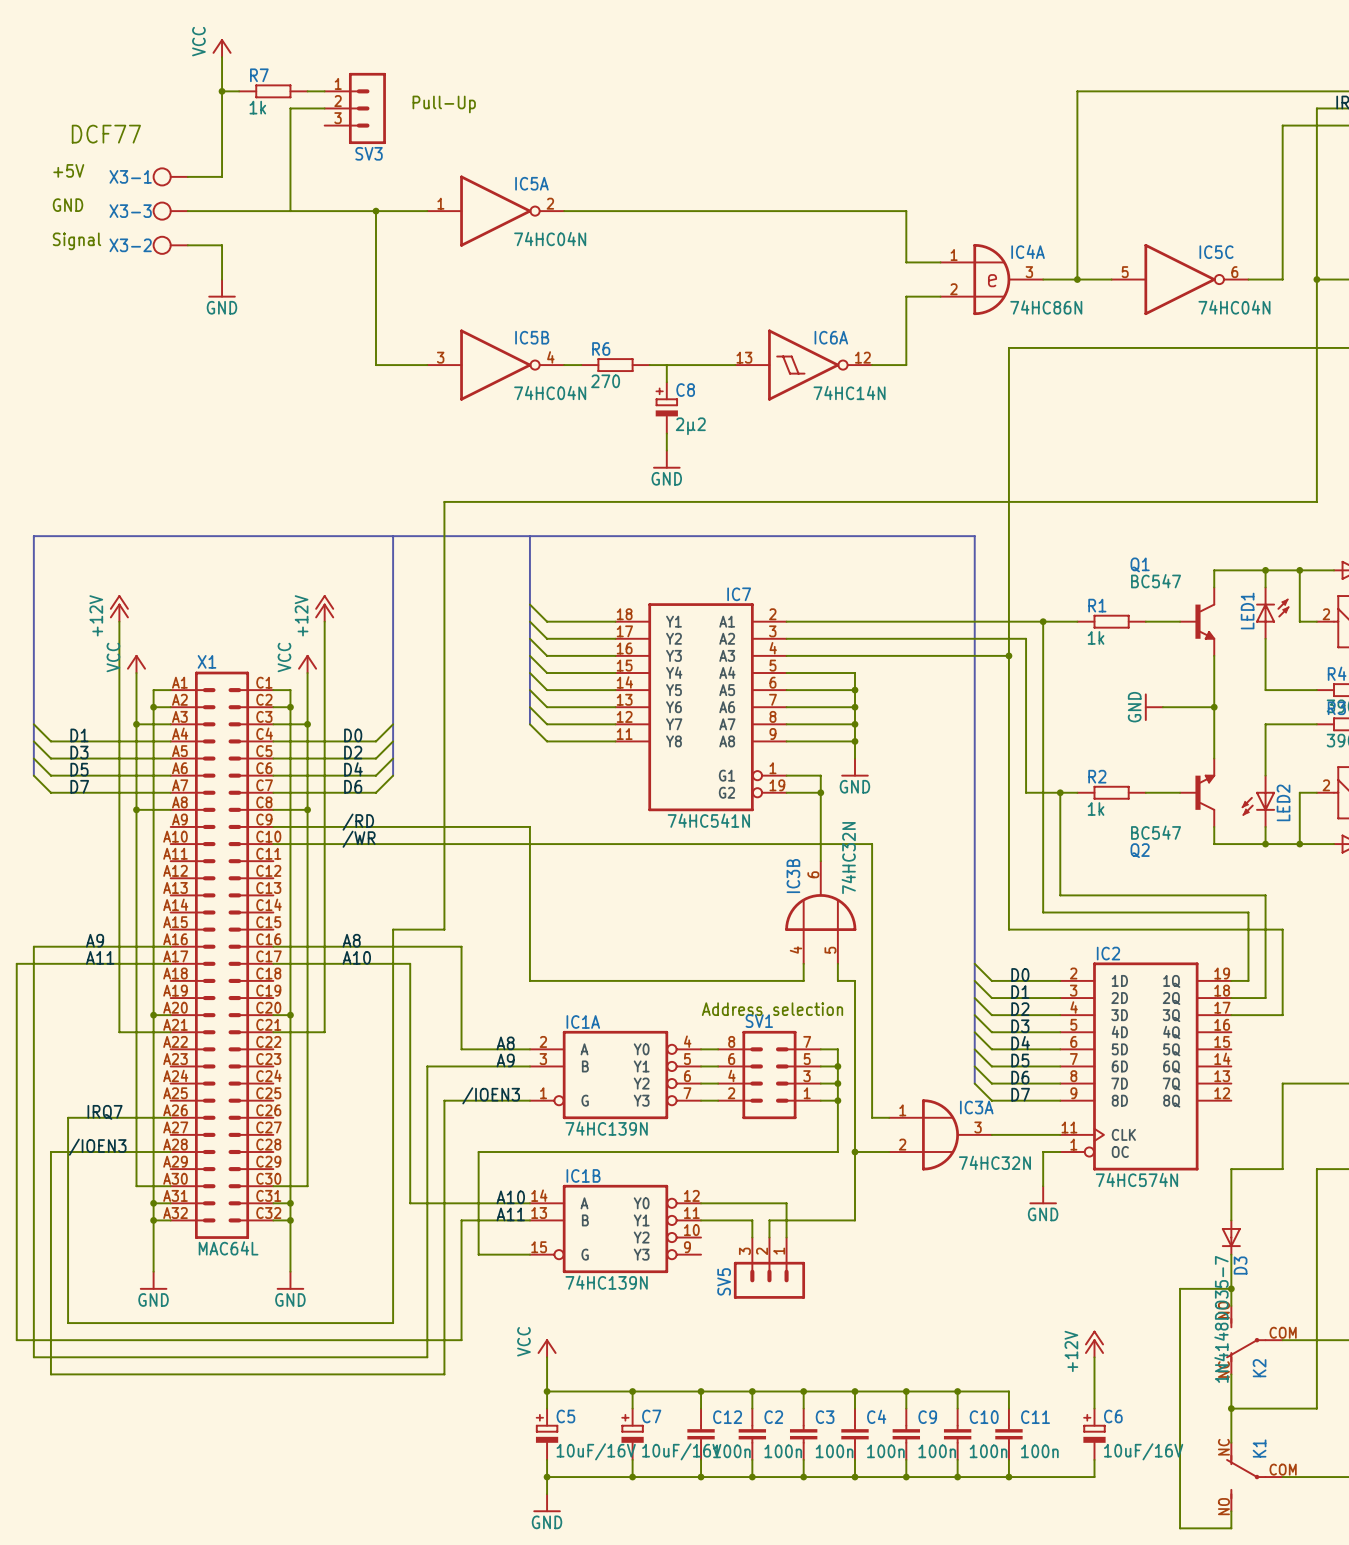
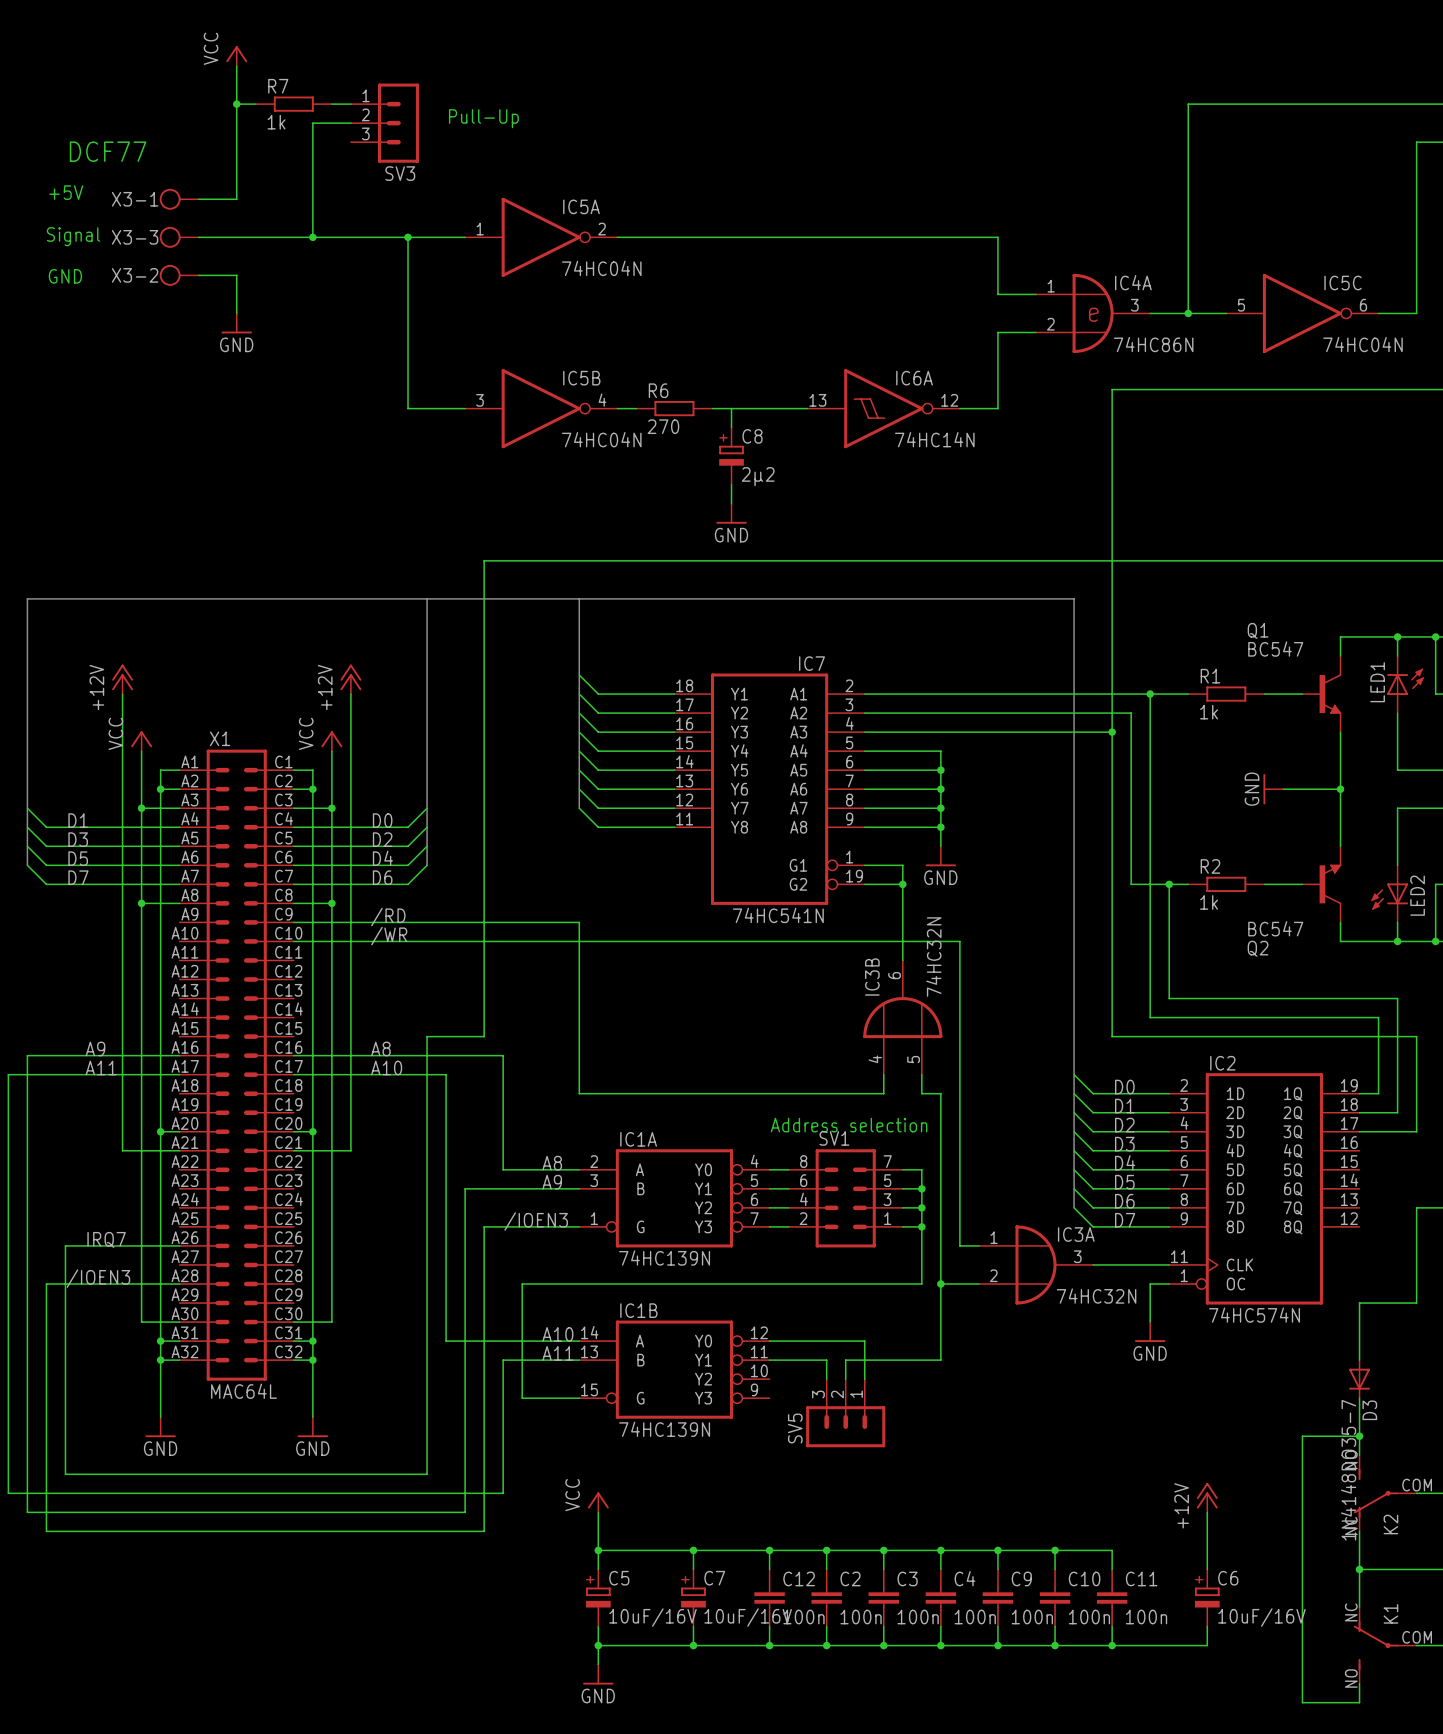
text: GND (68, 205) -> Signal (73, 236)
junction: none -> (312, 237)
text: Signal (76, 241) -> none
text: none -> GND (65, 276)

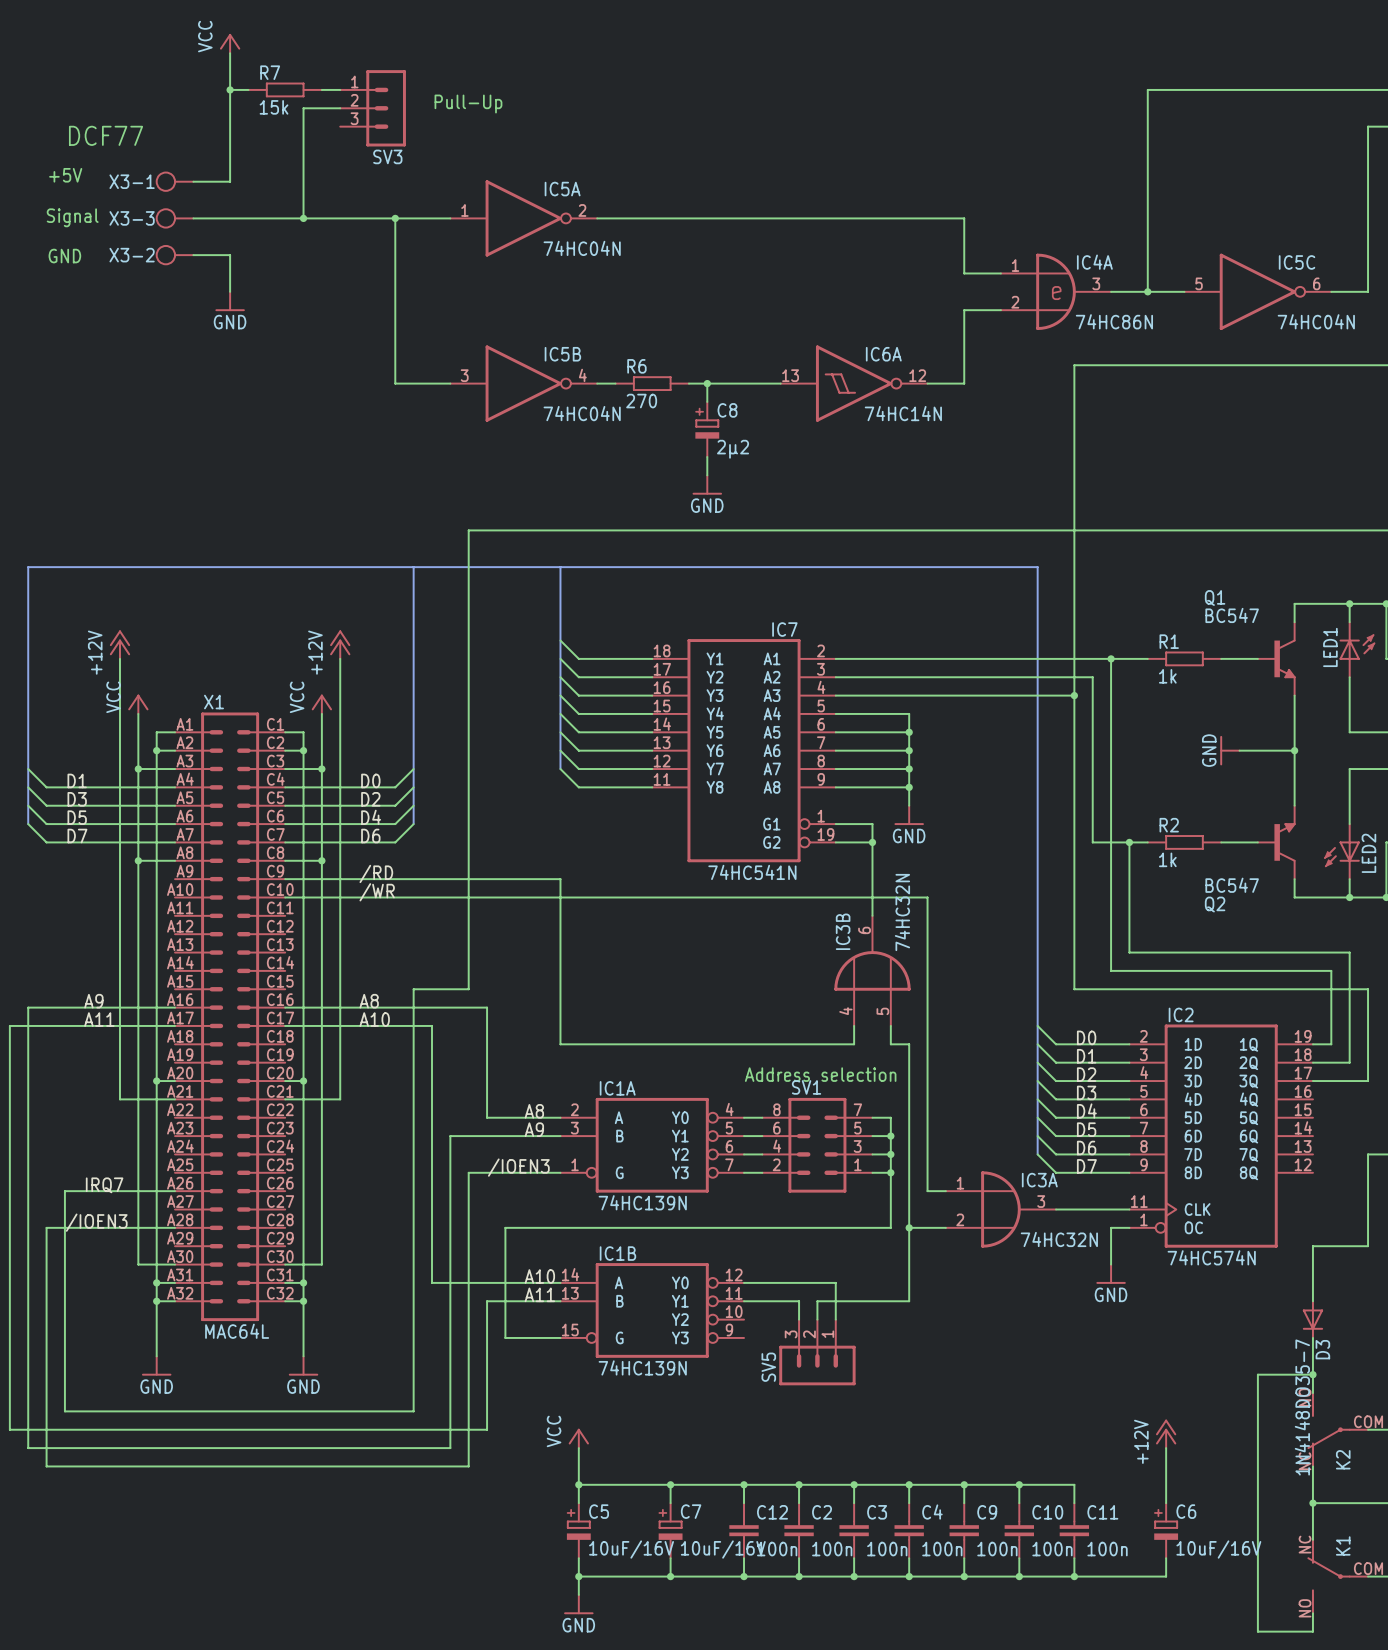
R7 value: 1k (276, 122) -> 15k (274, 107)
junction: none -> (707, 383)

